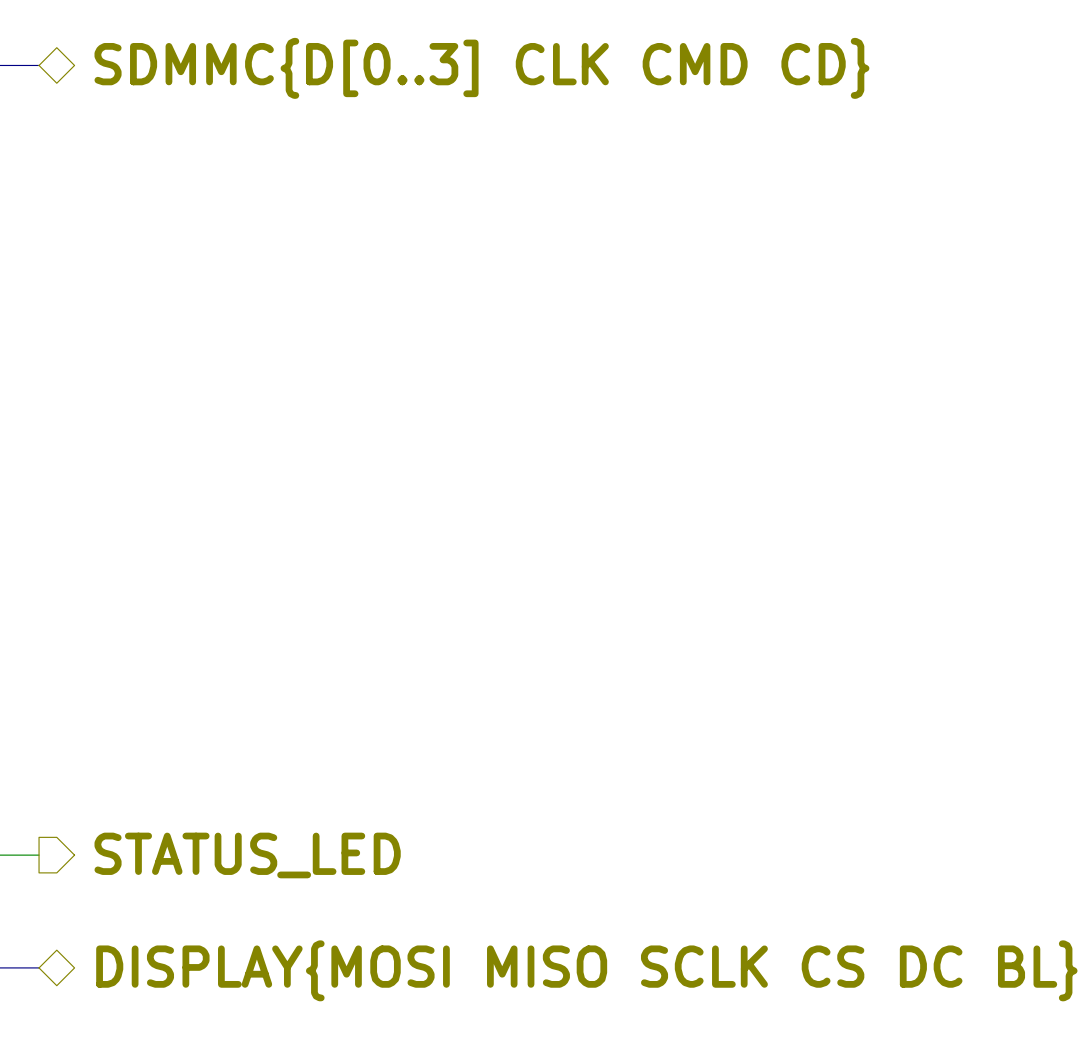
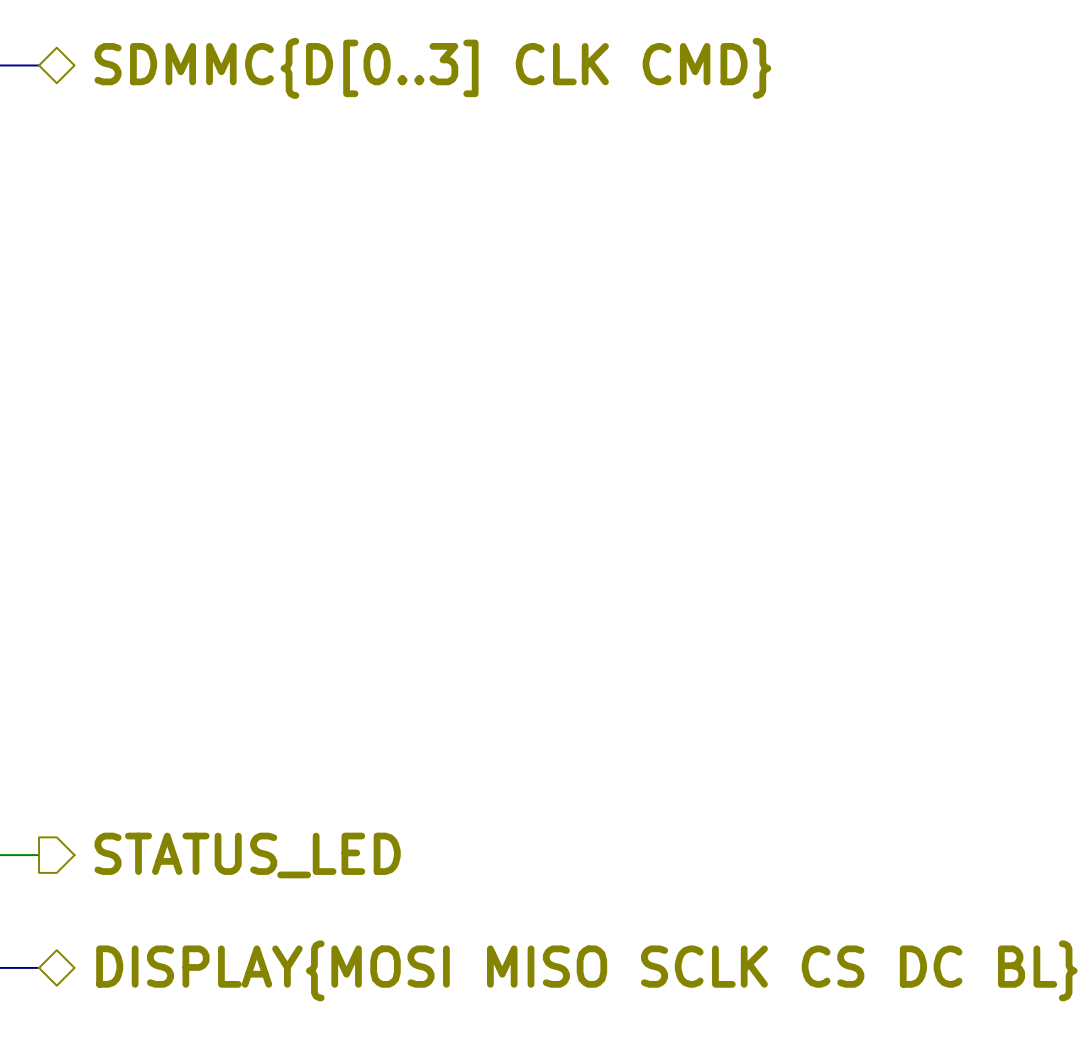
hierarchical label: SDMMC{D[0..3] CLK CMD CD} (481, 68) -> SDMMC{D[0..3] CLK CMD} (432, 68)

